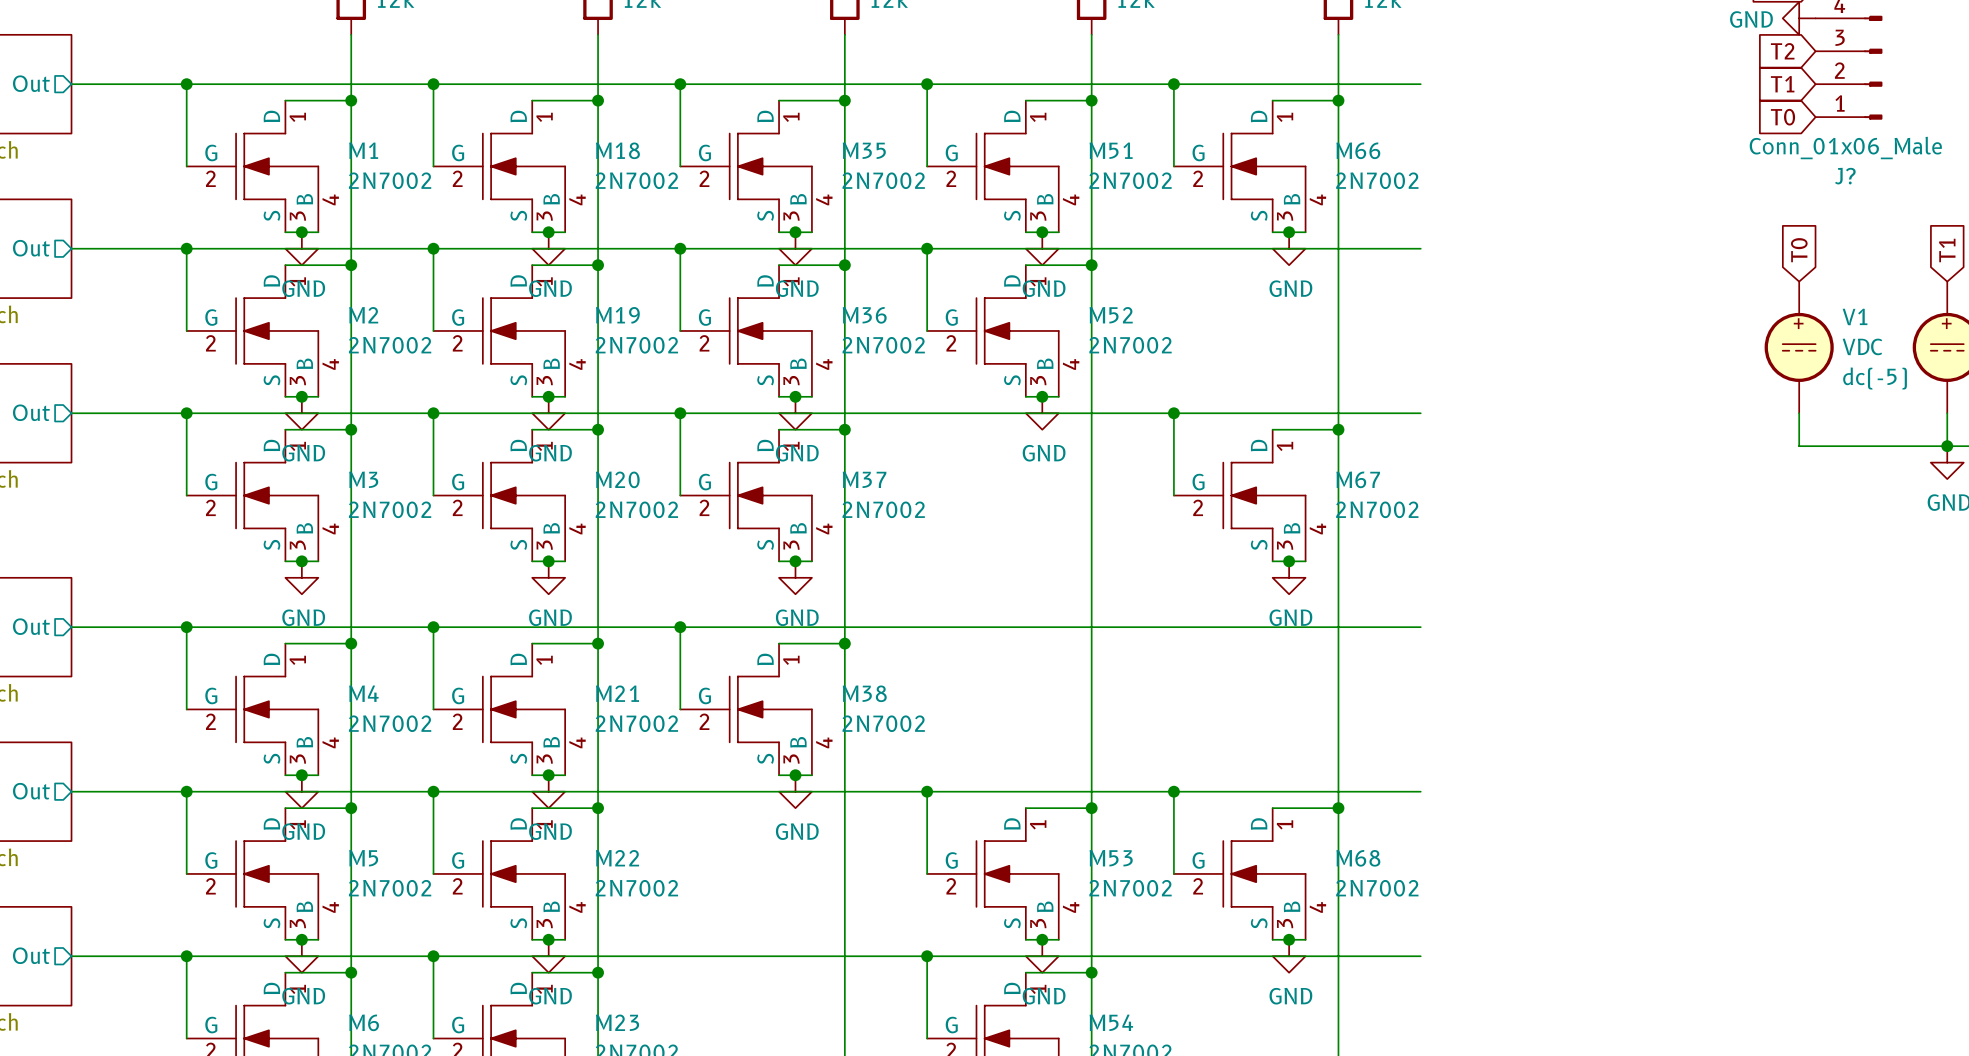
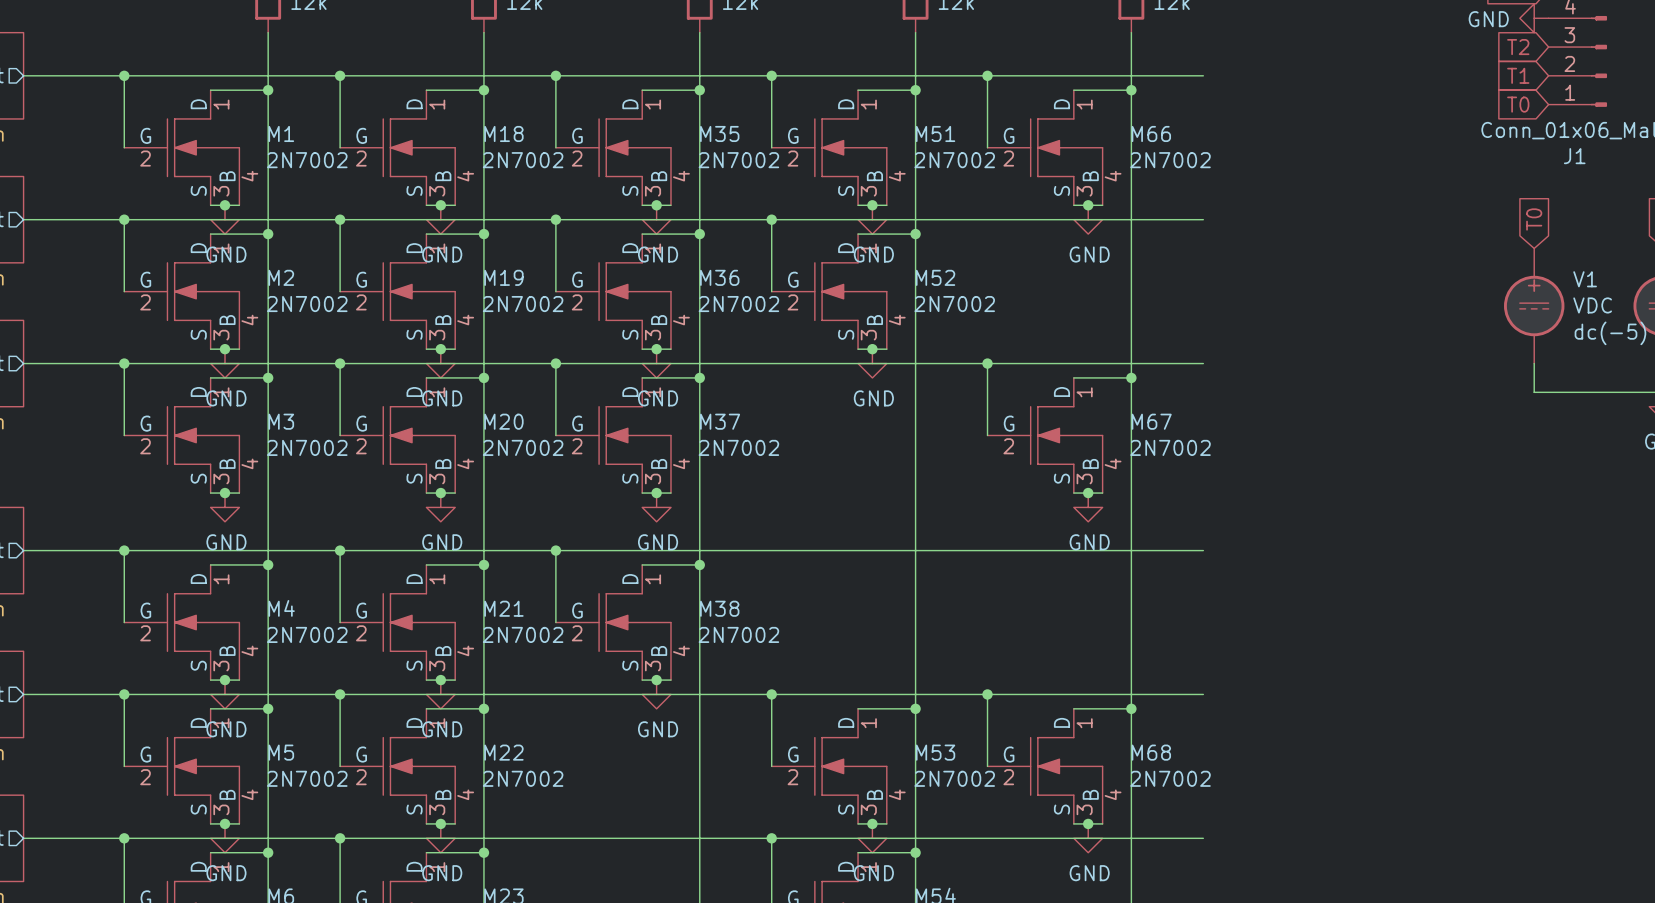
J? name: J? (1845, 176) -> J1 (1574, 156)

